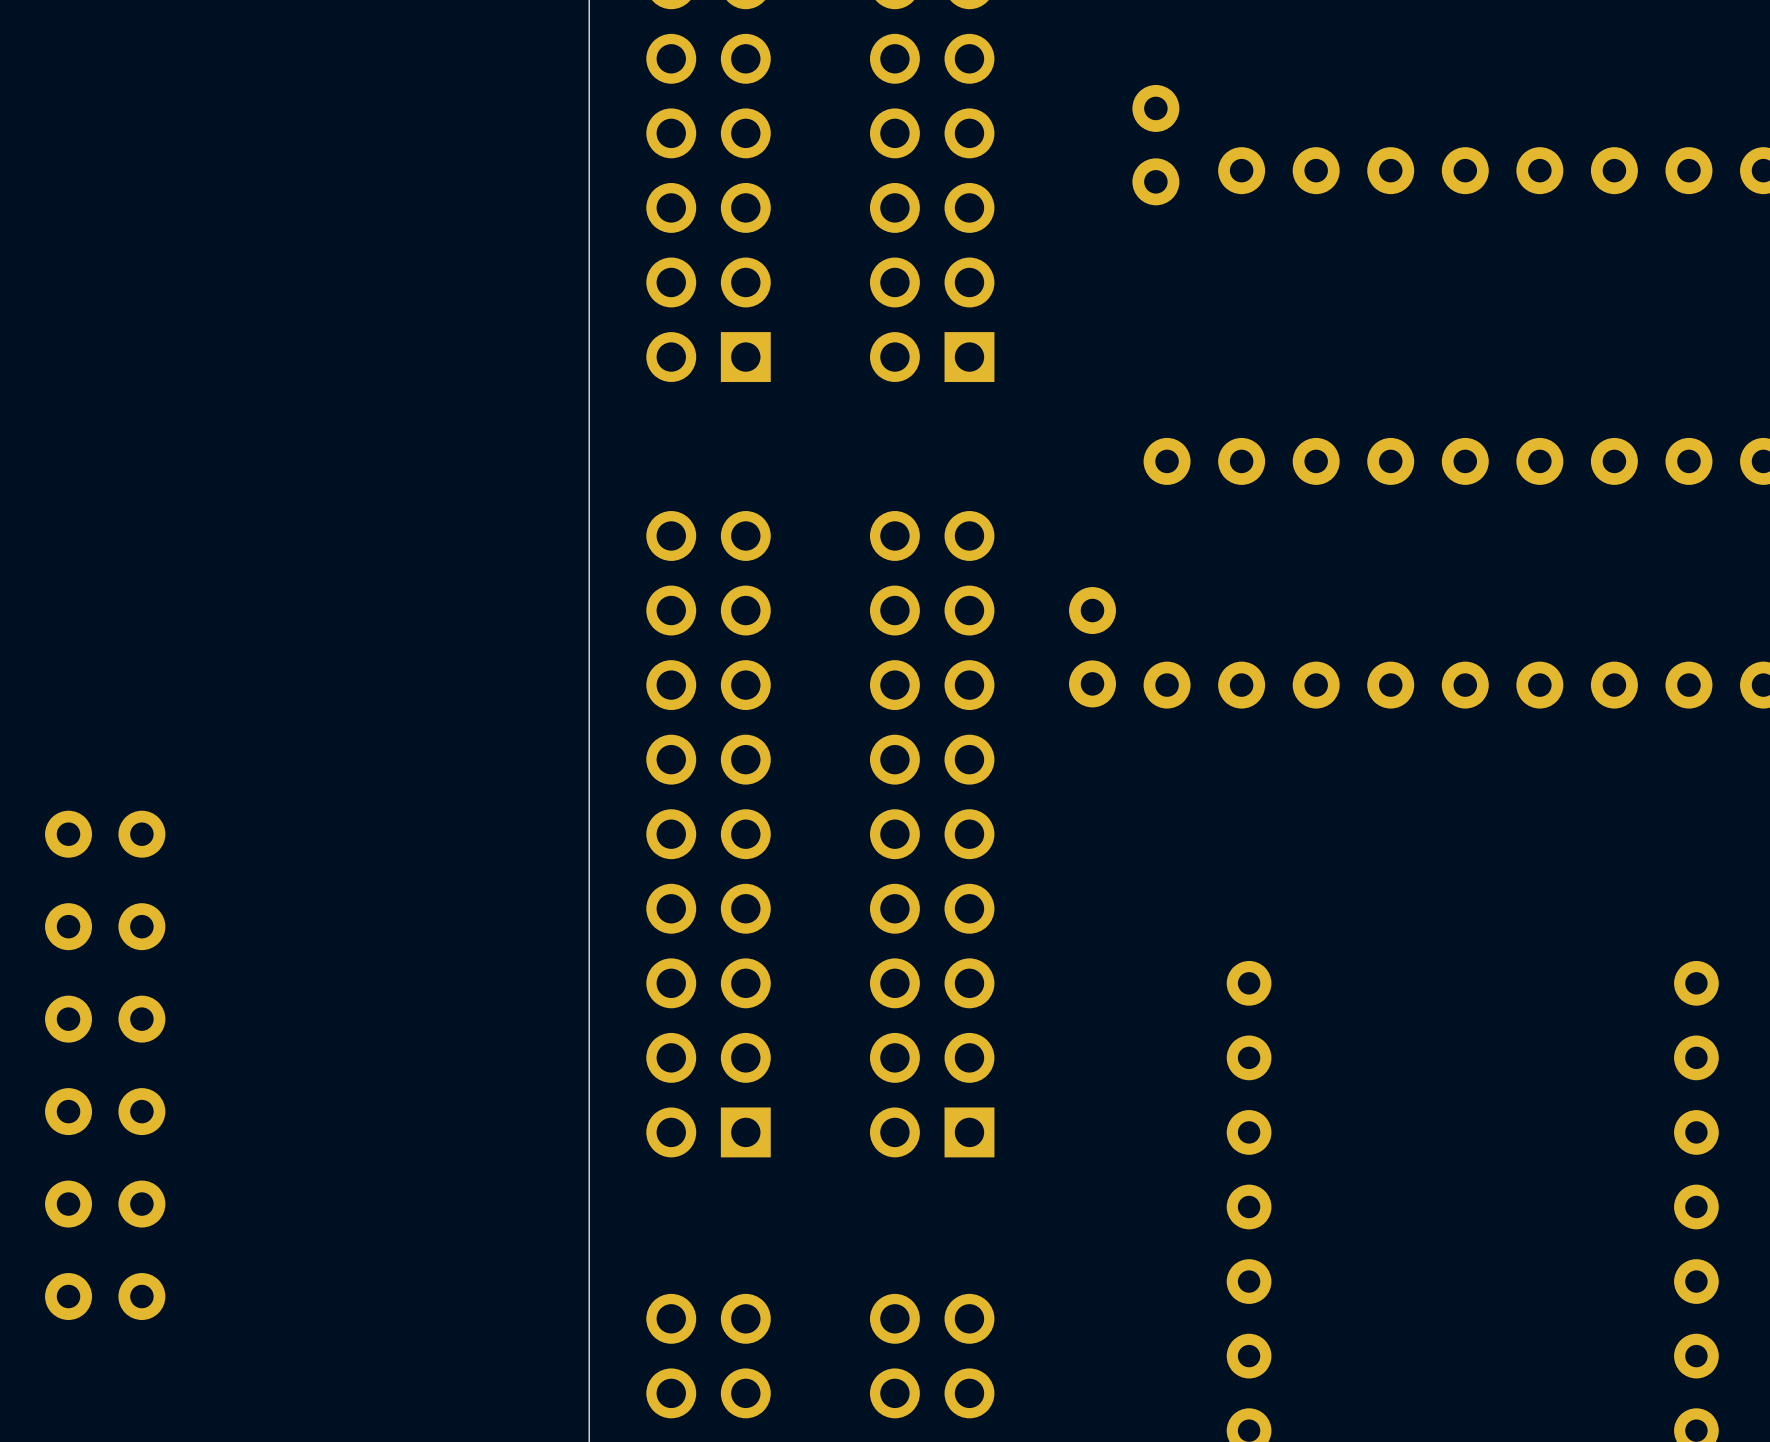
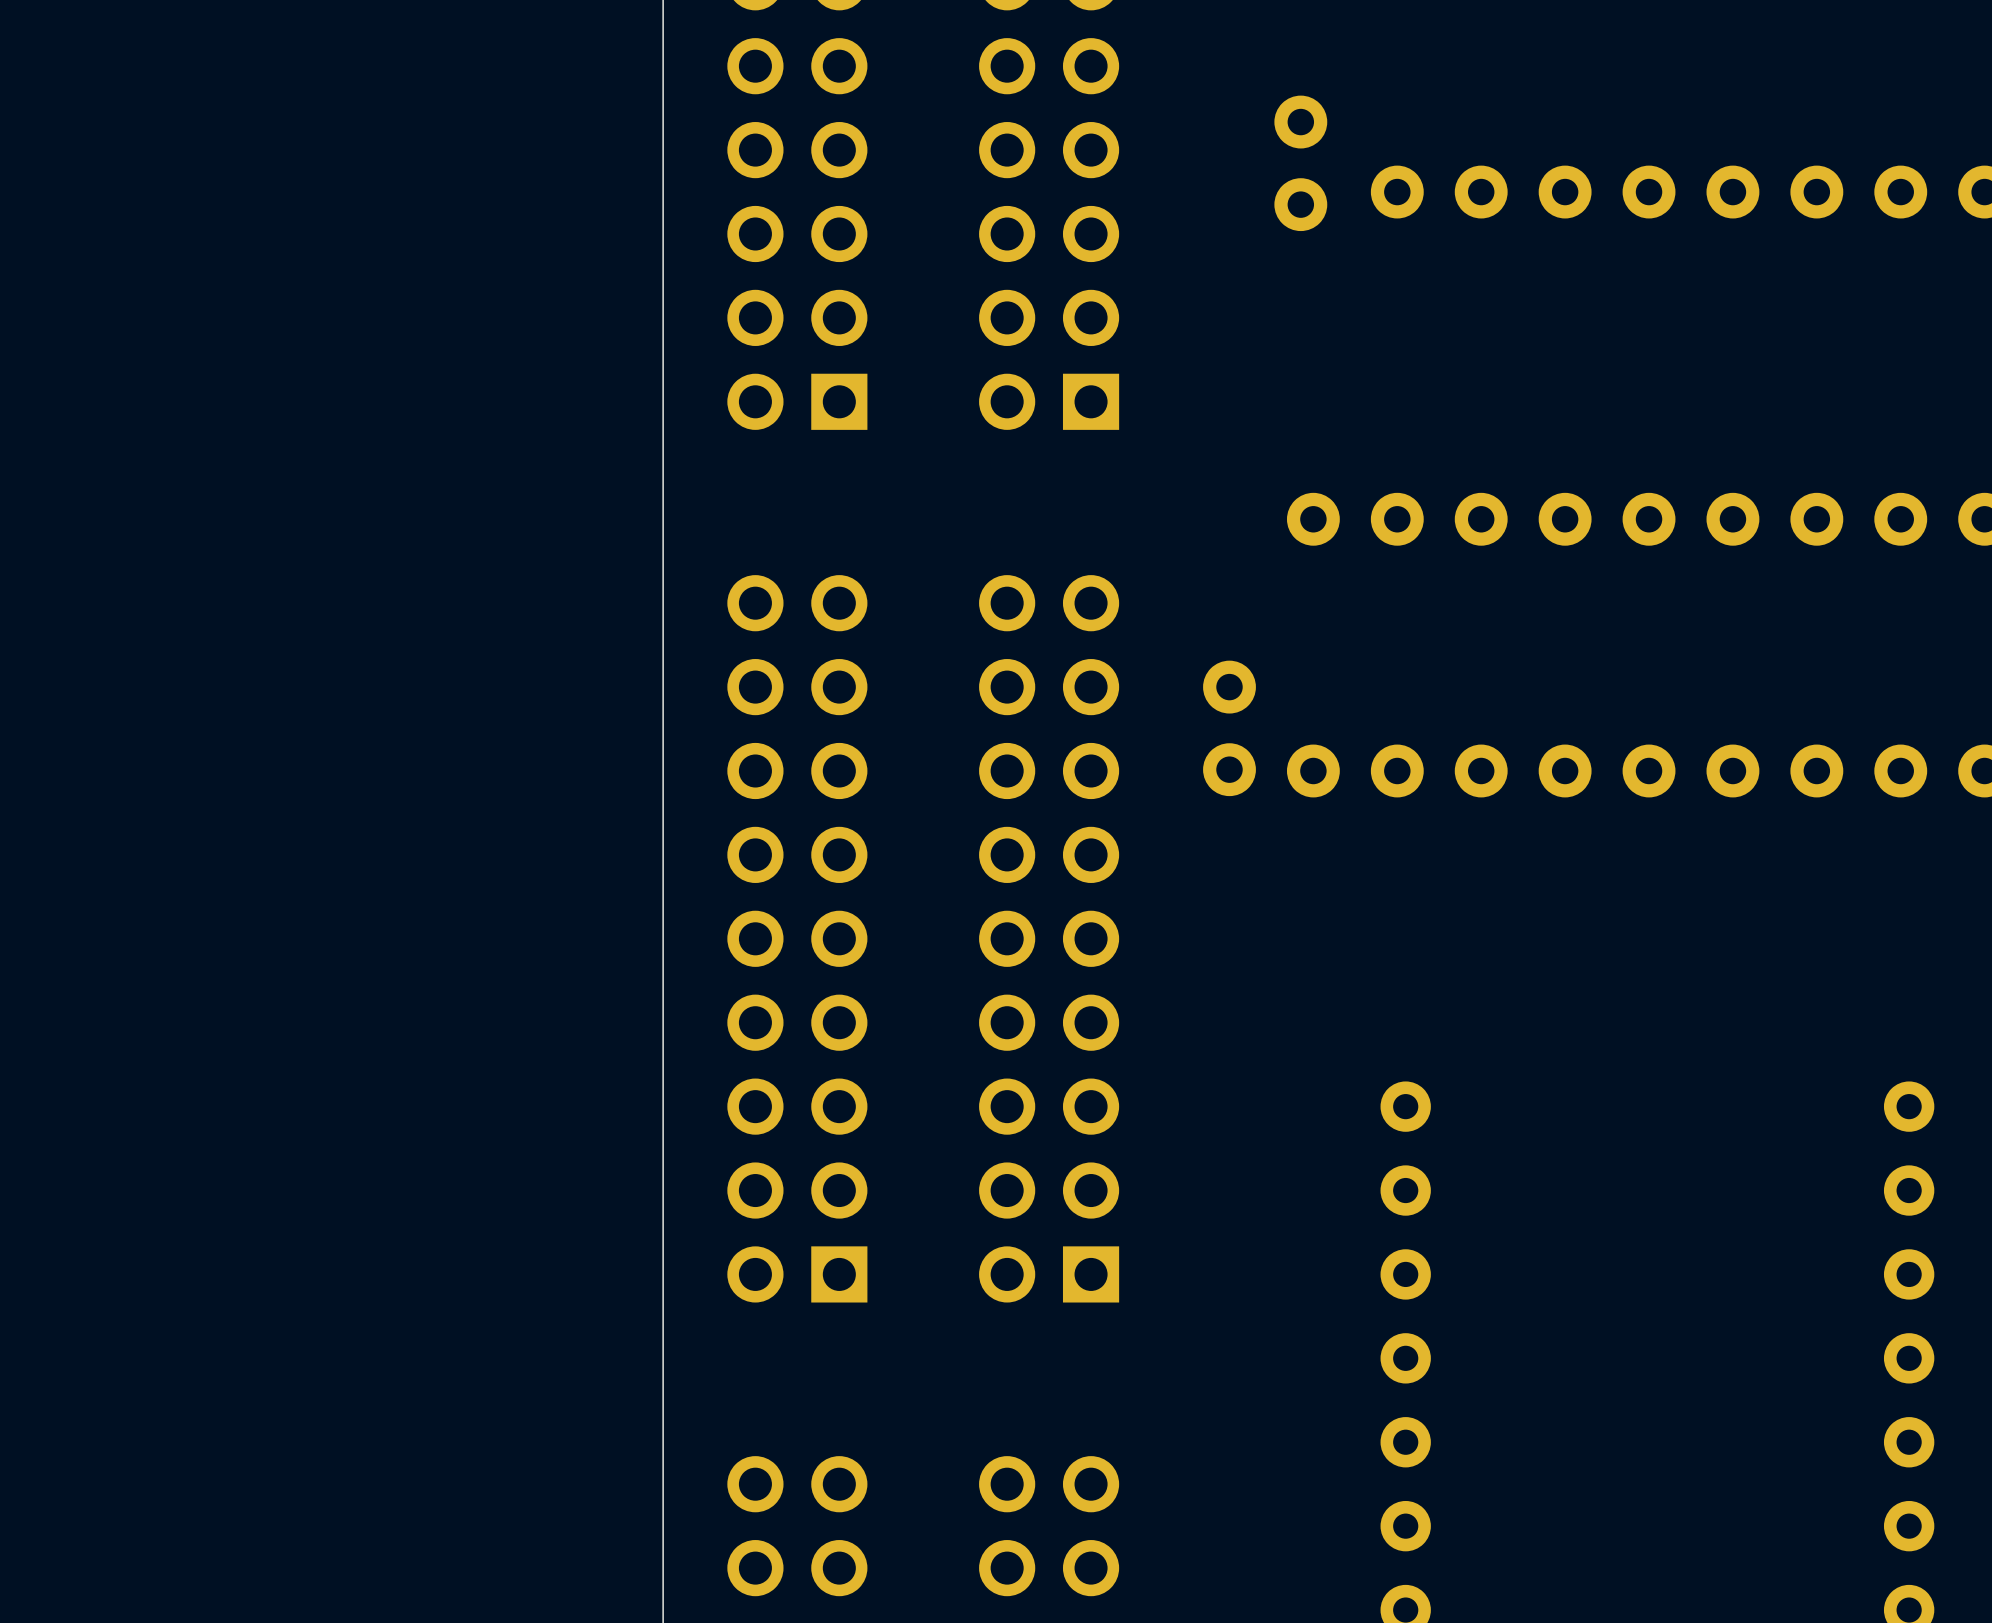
part: (105, 834) -> none
part: (105, 926) -> none
part: (105, 1019) -> none
part: (105, 1111) -> none
part: (105, 1204) -> none
part: (105, 1296) -> none

